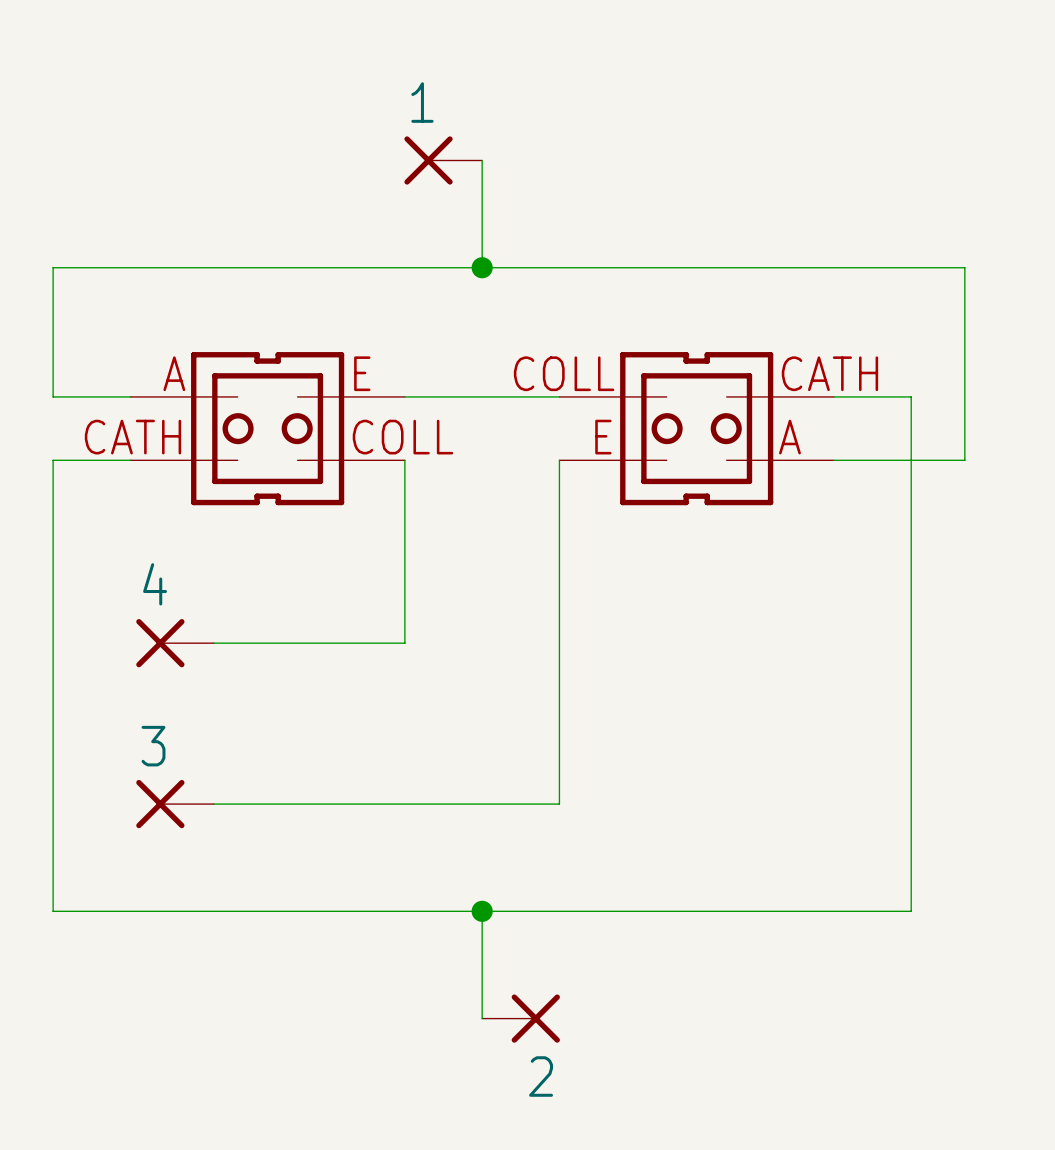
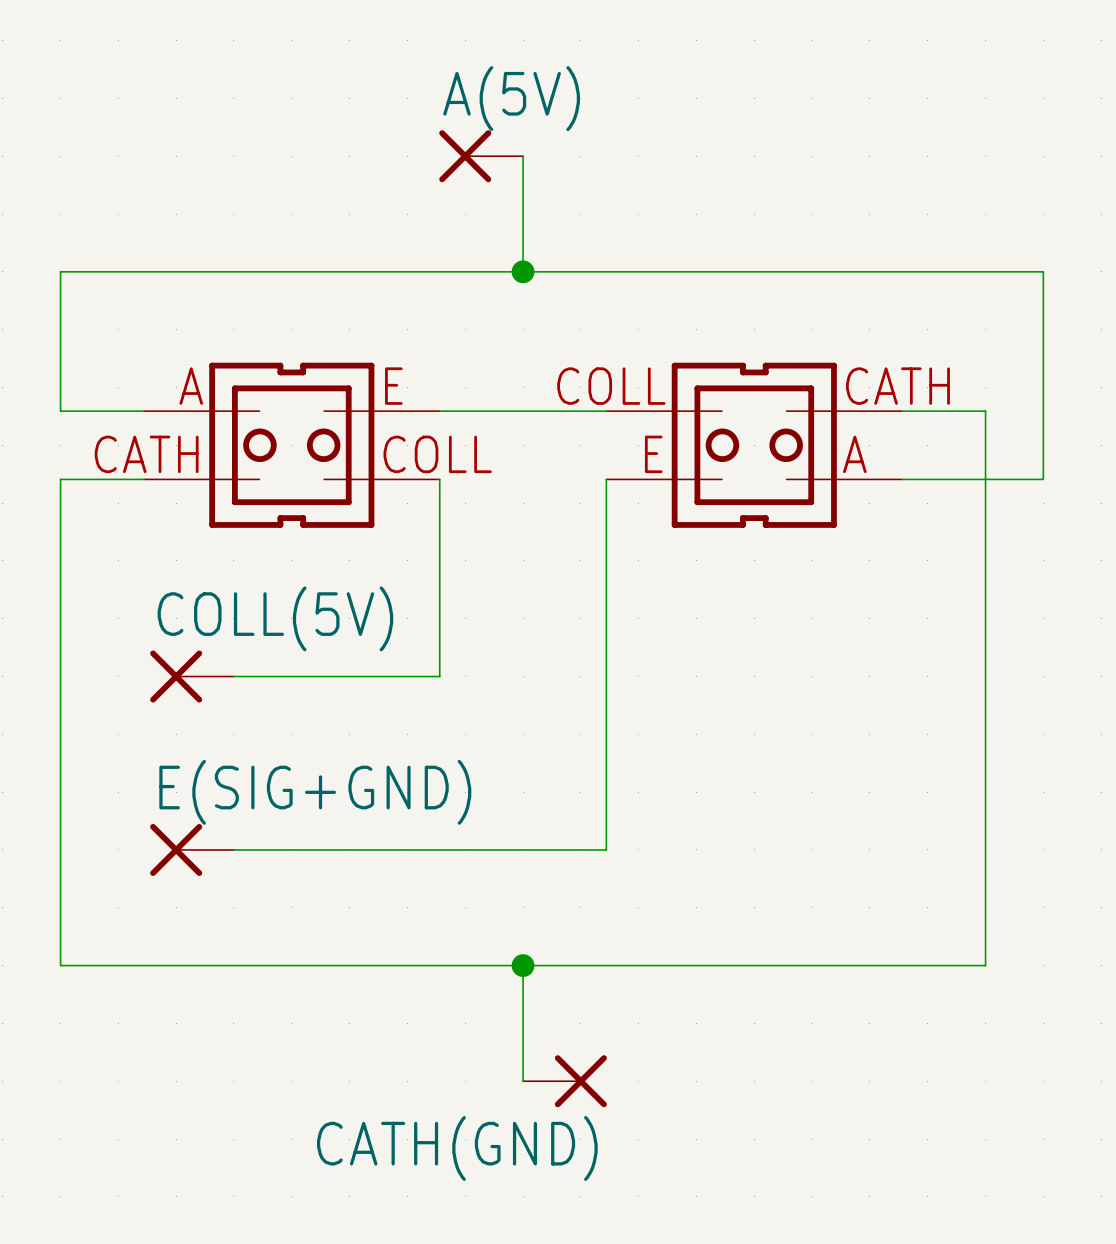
1 name: 1 (422, 102) -> A(5V) (511, 98)
4 name: 4 (155, 584) -> COLL(5V) (275, 618)
3 name: 3 (153, 746) -> E(SIG+GND) (315, 792)
2 name: 2 (541, 1076) -> CATH(GND) (457, 1148)

